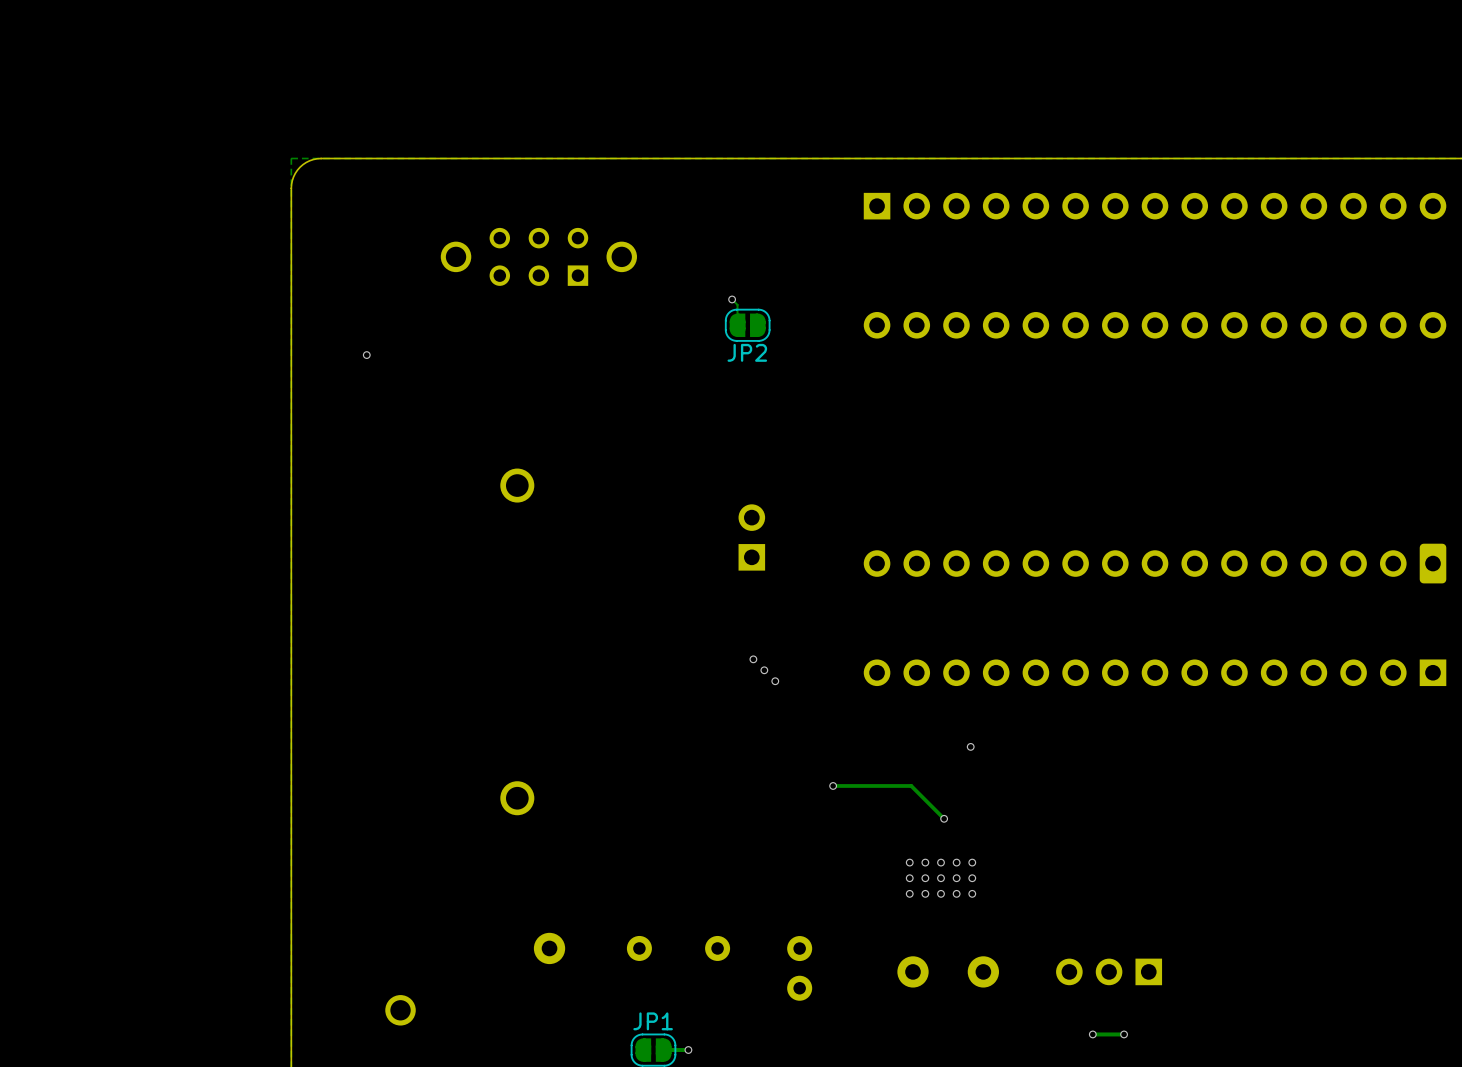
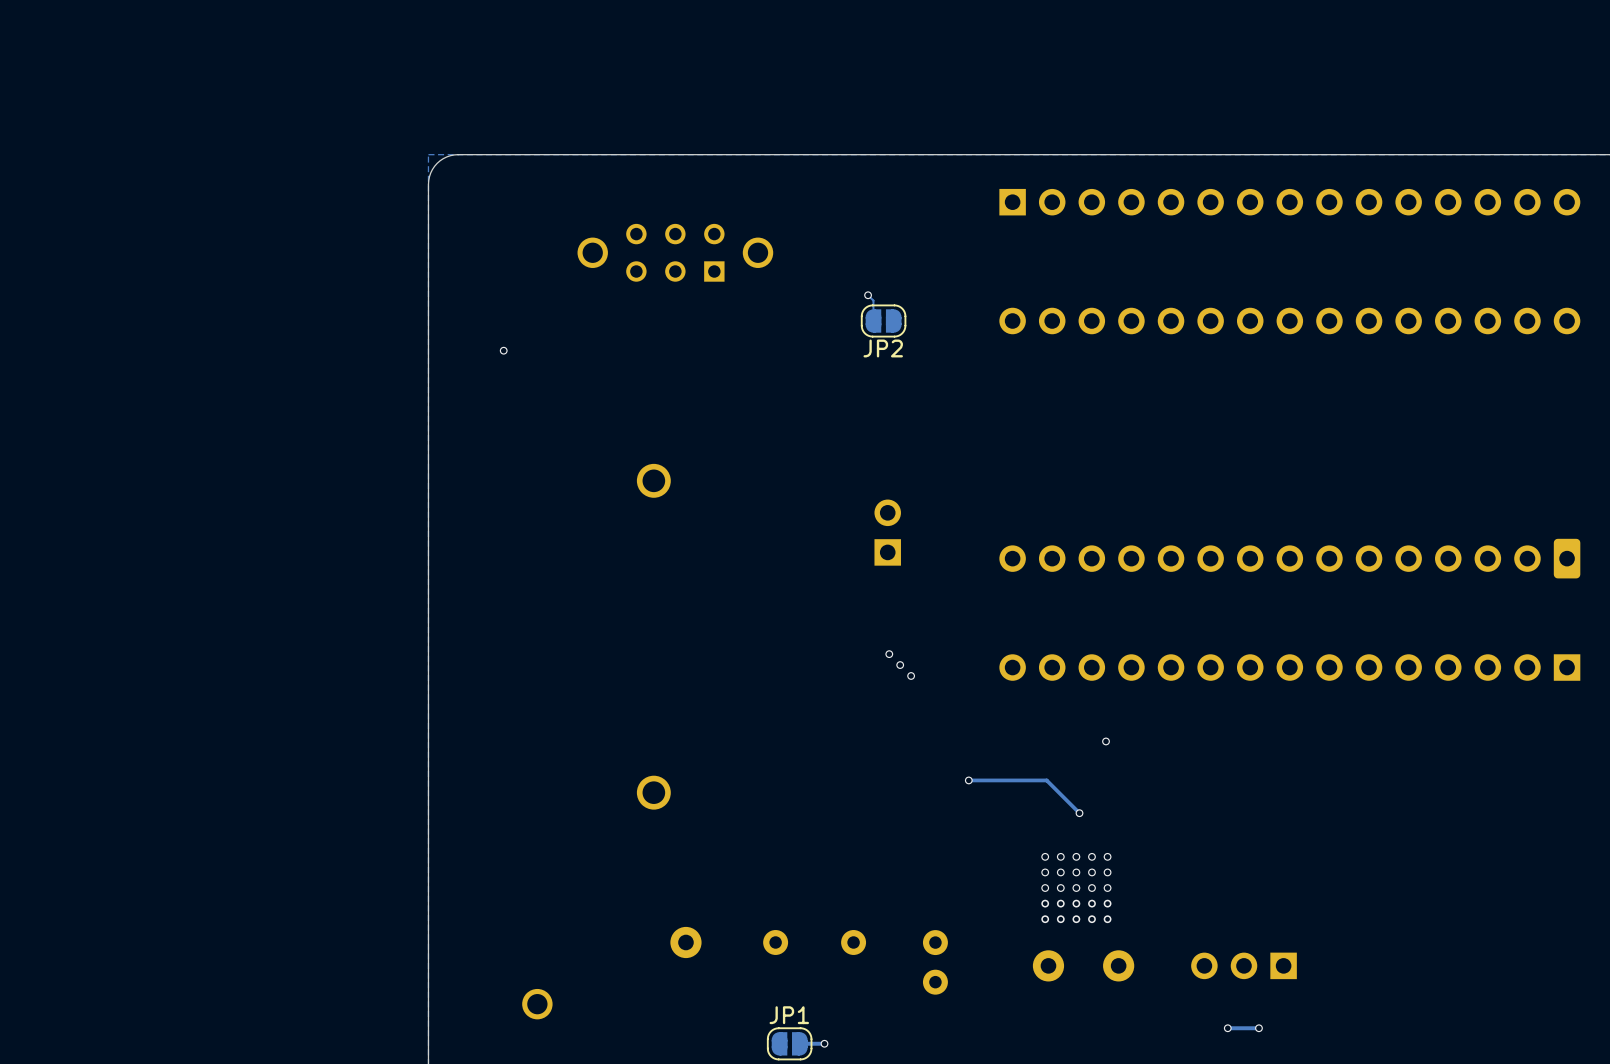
via: none -> (1045, 903)
via: none -> (1060, 903)
via: none -> (1076, 903)
via: none -> (1091, 903)
via: none -> (1107, 903)
via: none -> (1045, 919)
via: none -> (1060, 919)
via: none -> (1076, 919)
via: none -> (1091, 919)
via: none -> (1107, 919)

